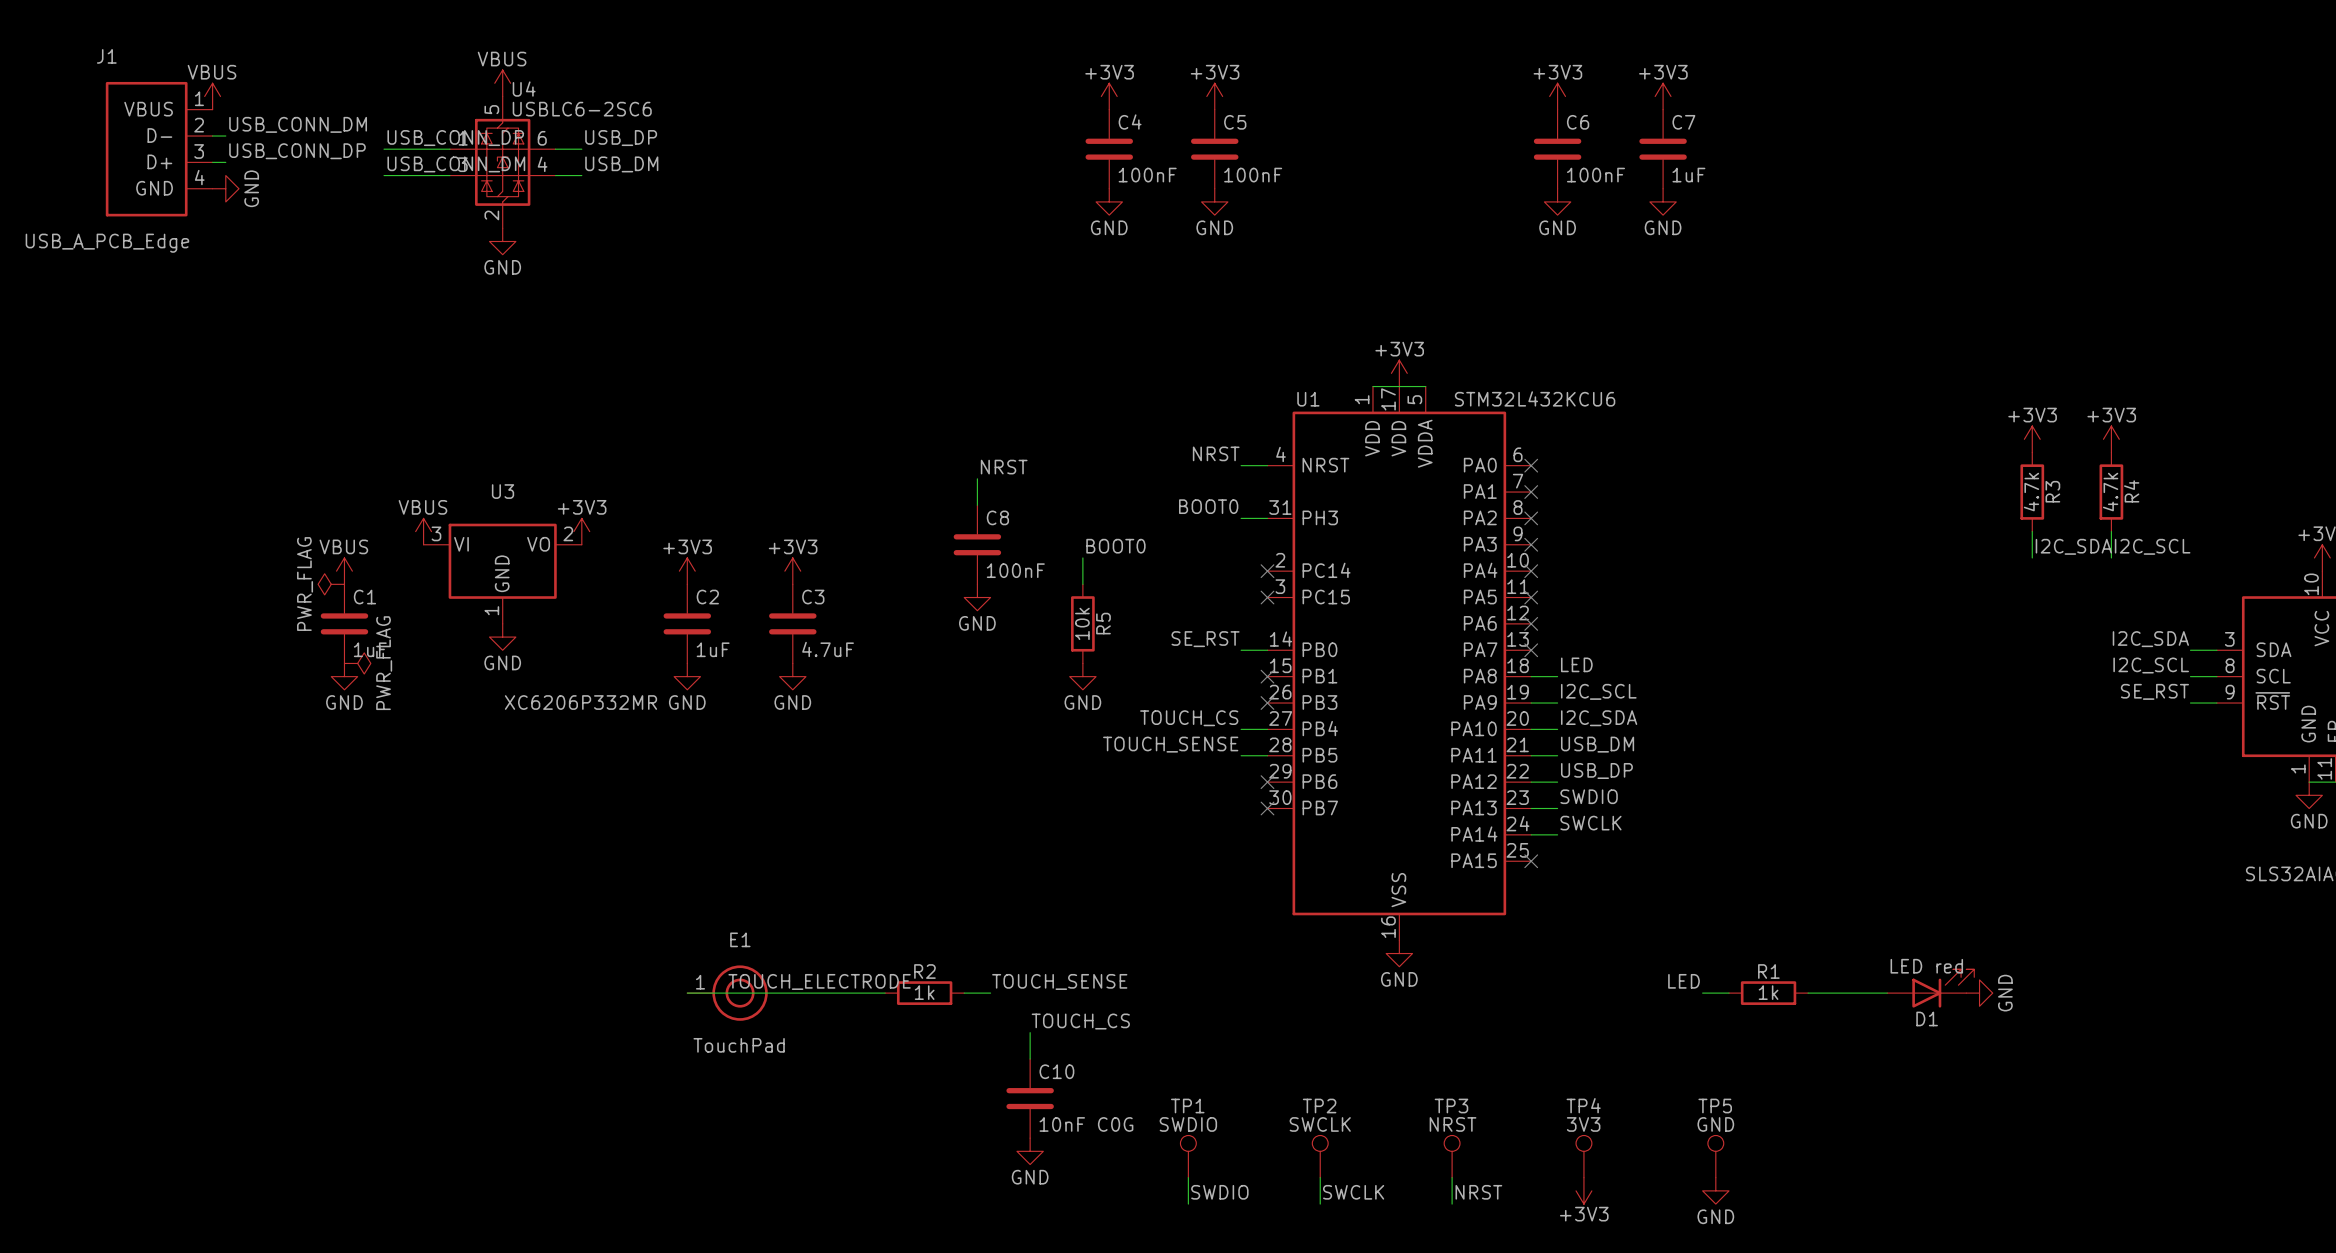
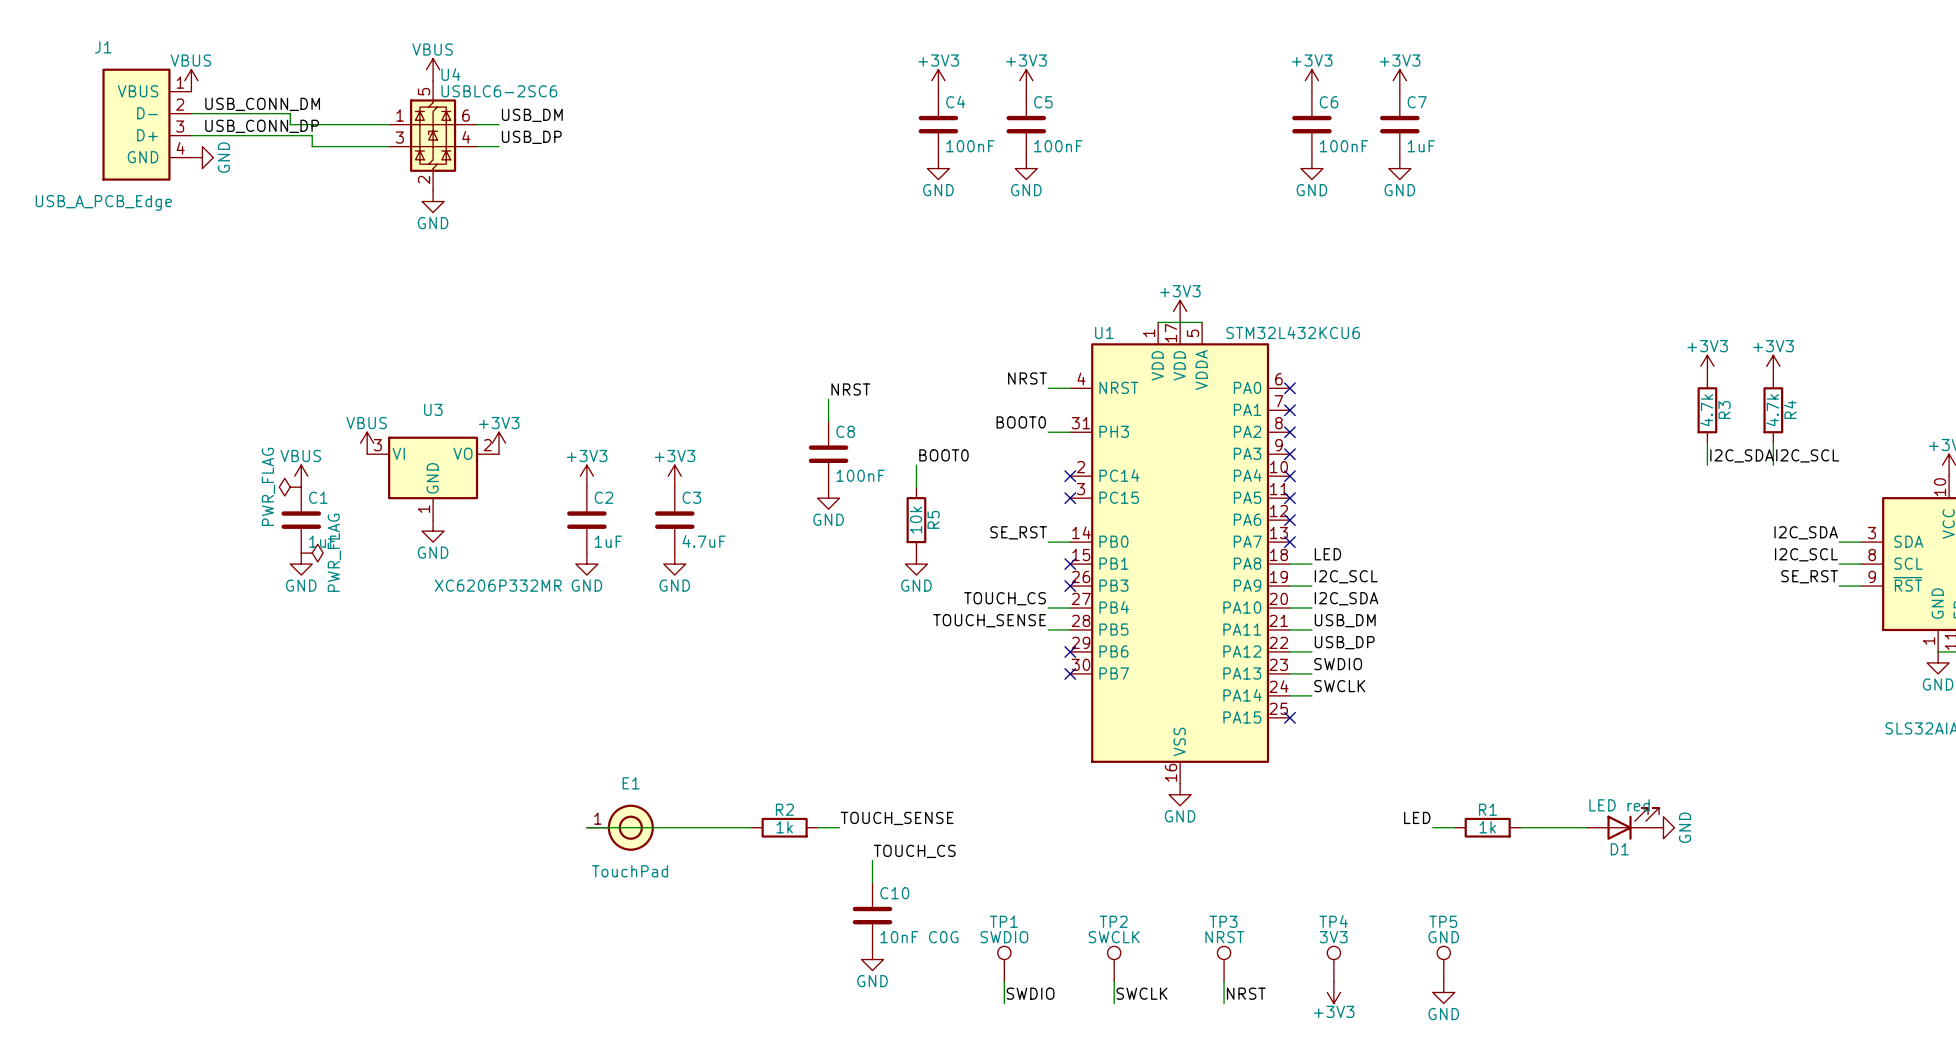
wire: none -> (202, 113) (290, 113) (290, 124) (334, 124)
label: USB_CONN_DP (455, 138) -> none
label: USB_DP (621, 138) -> USB_DM (532, 115)
wire: none -> (202, 135) (312, 135) (312, 146) (334, 146)
label: USB_CONN_DM (456, 164) -> none
label: USB_DM (621, 164) -> USB_DP (531, 137)
label: TOUCH_ELECTRODE (819, 981) -> none

